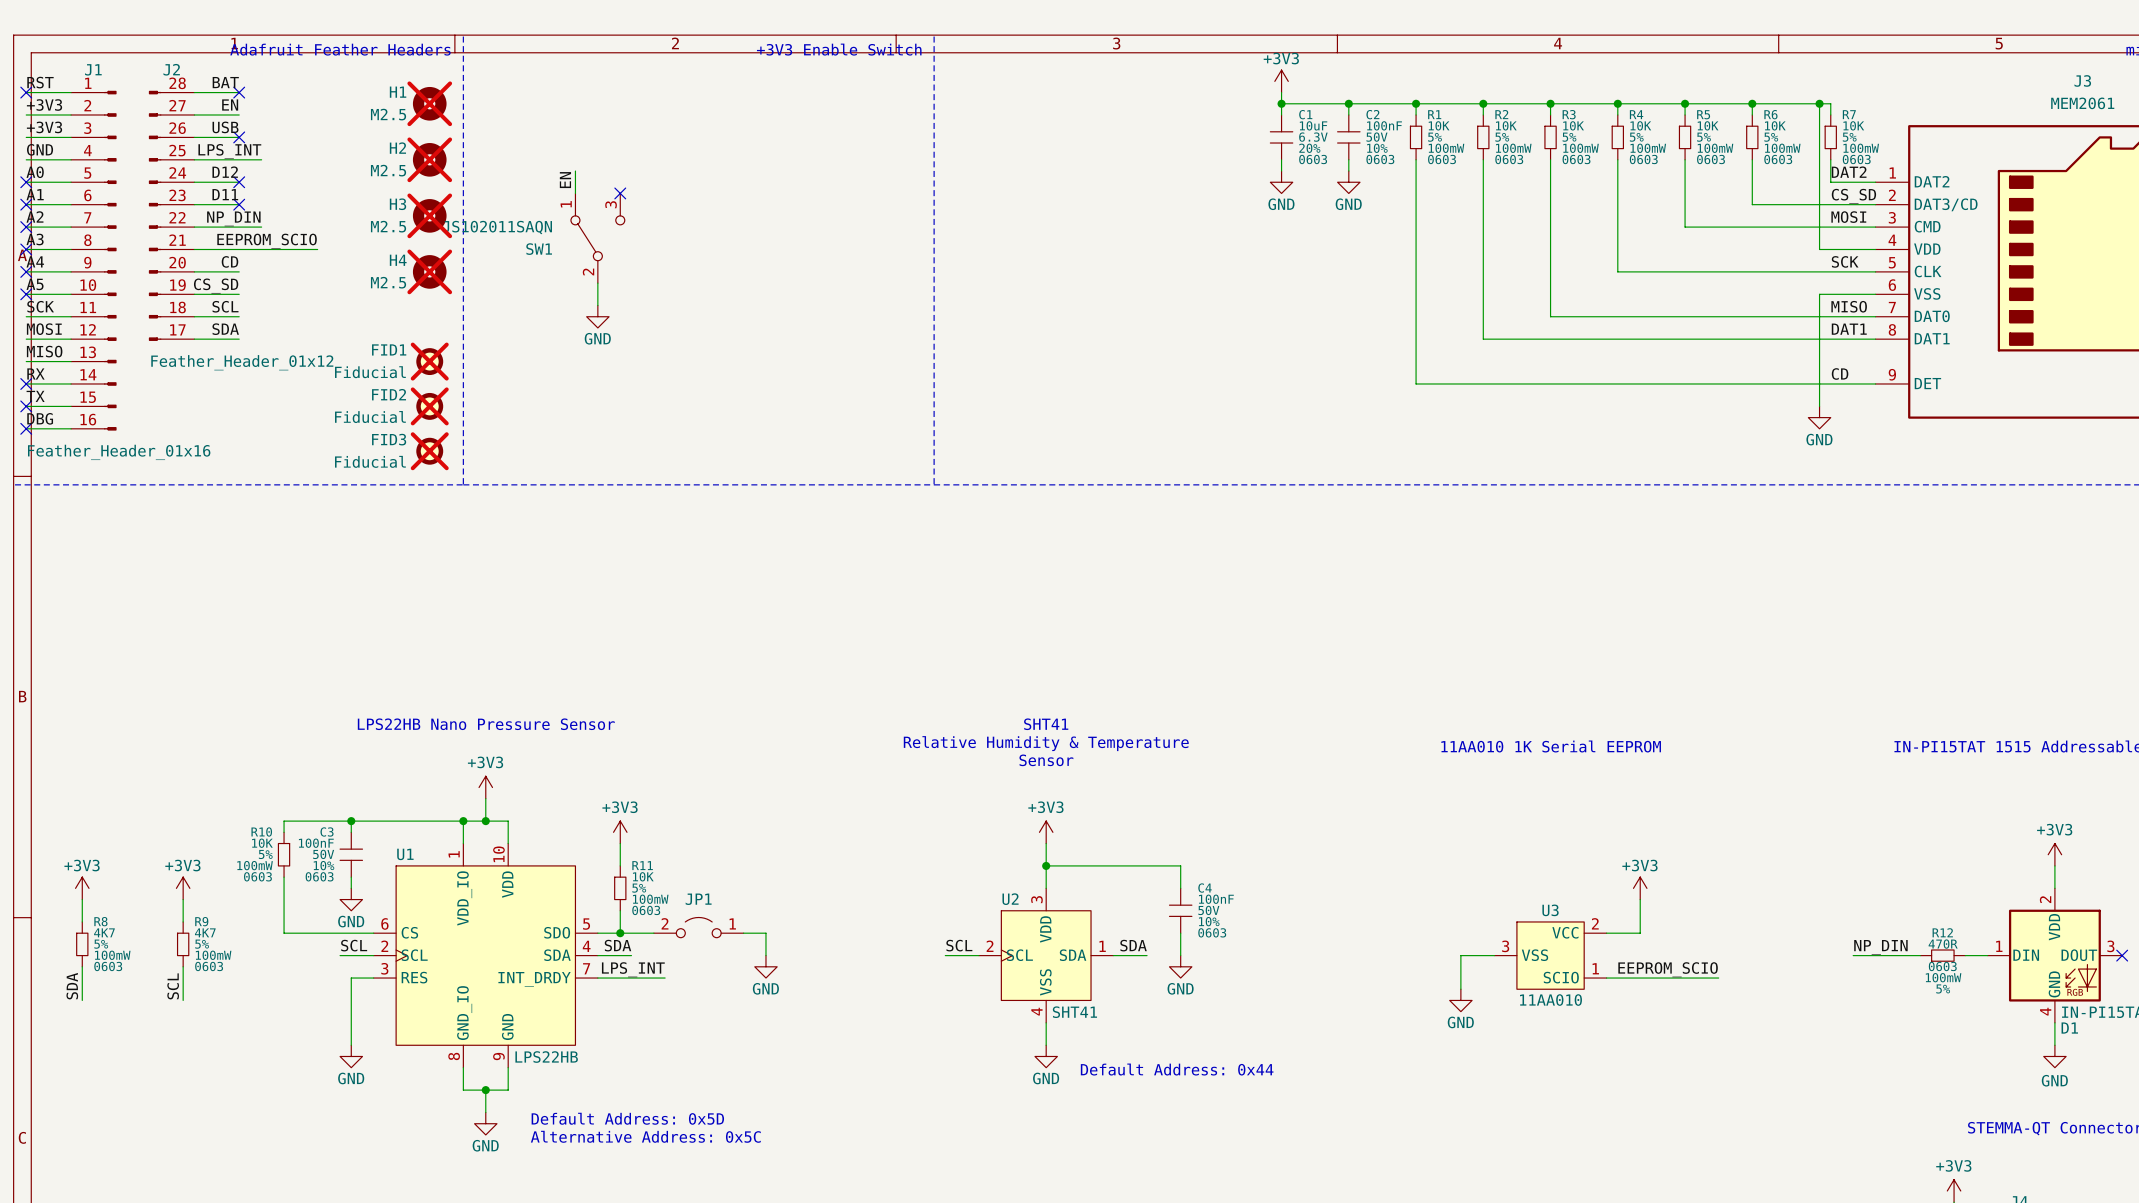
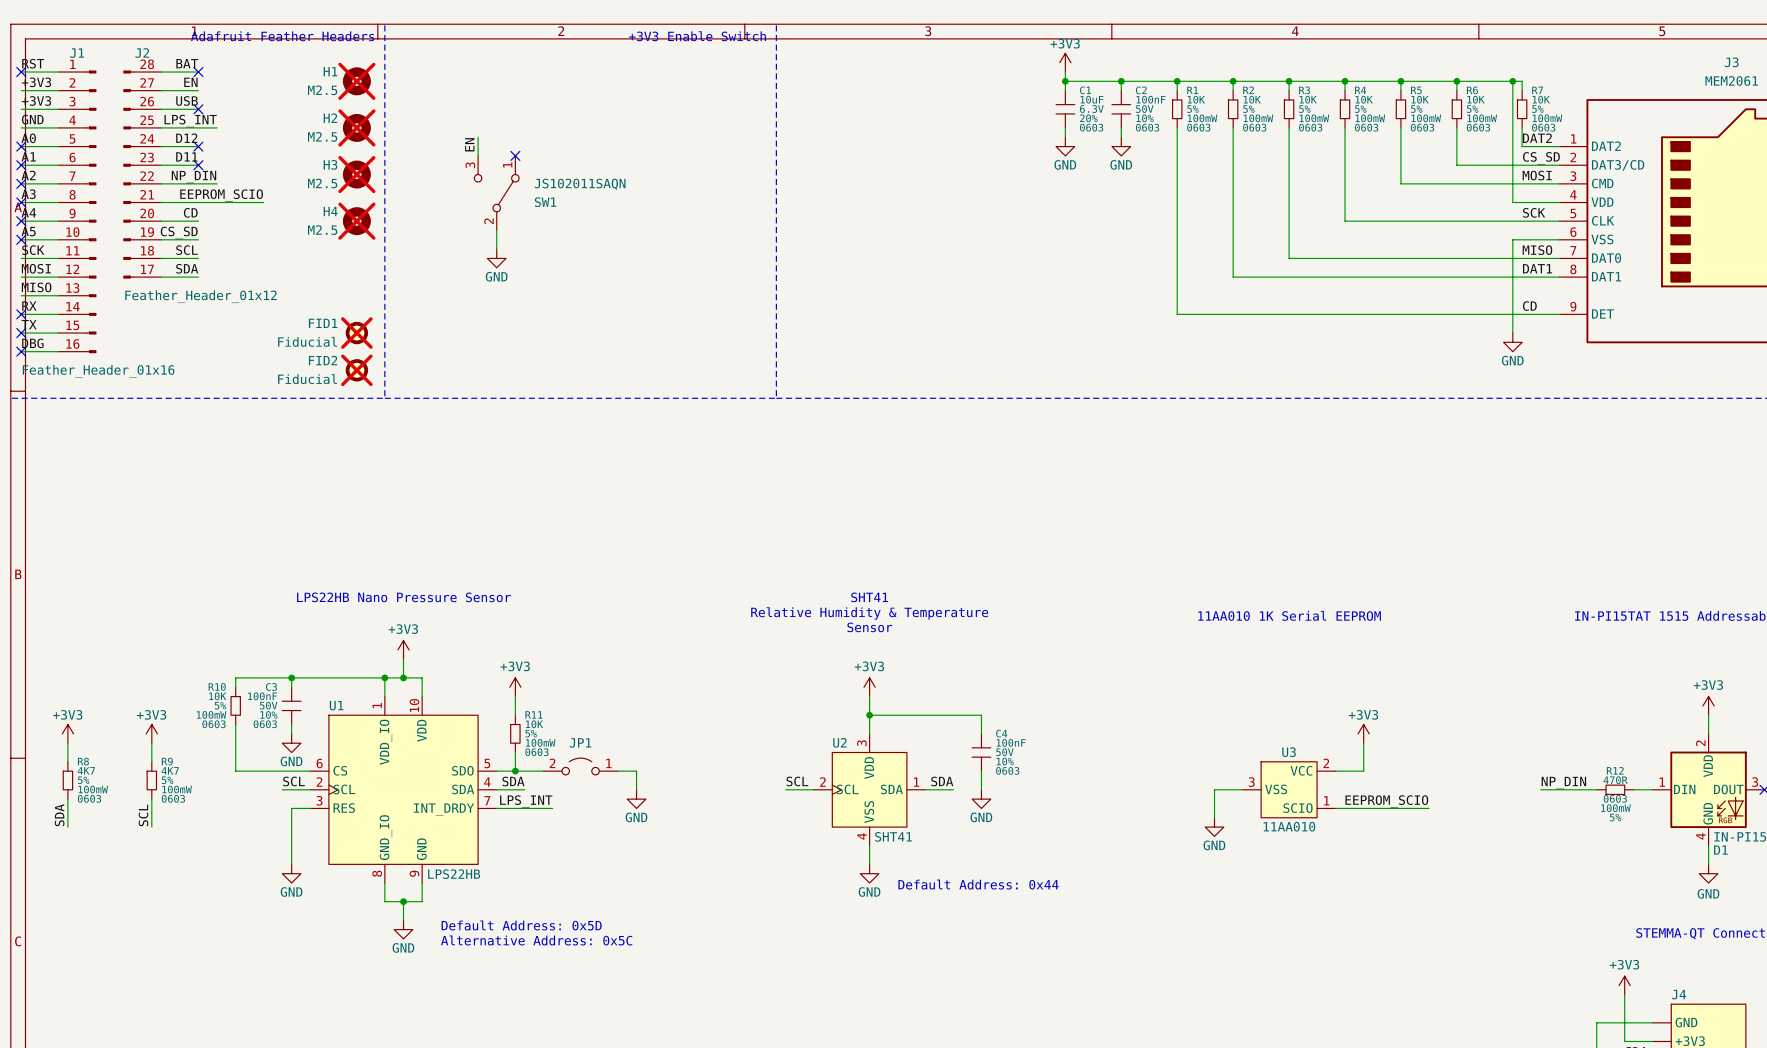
SW1 flip: as is (597, 238) -> left-right (496, 193)
FID1: Fiducial (429, 361) -> none
FID2 name: FID2 (389, 394) -> FID1 (323, 323)
FID3 name: FID3 (389, 439) -> FID2 (323, 360)

